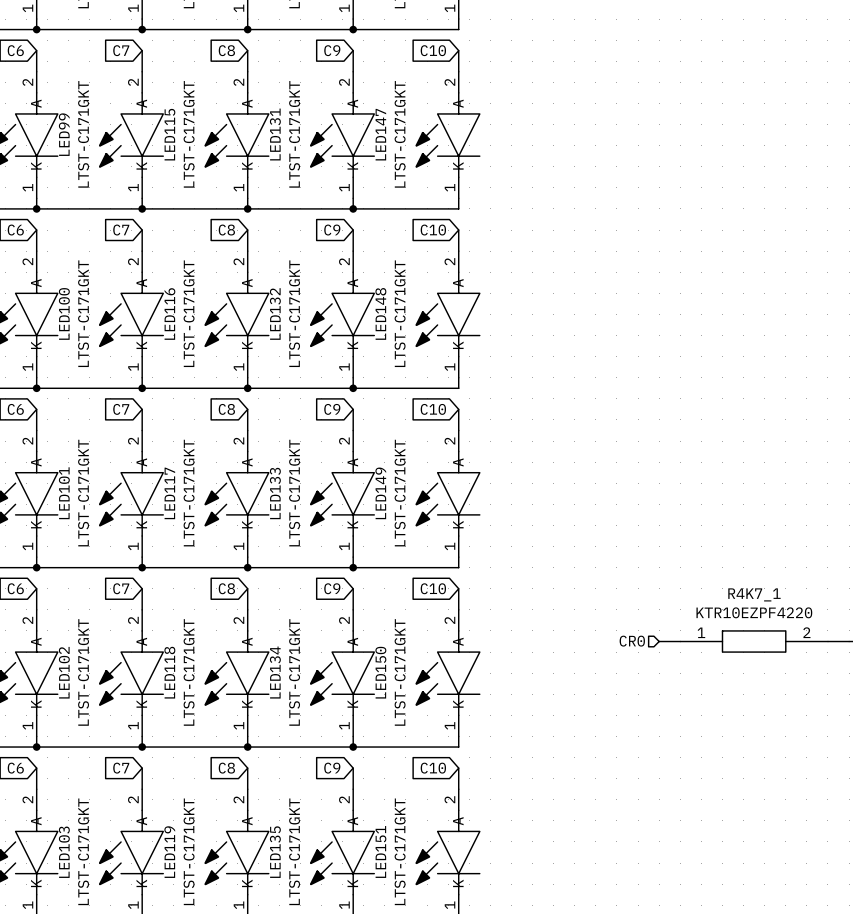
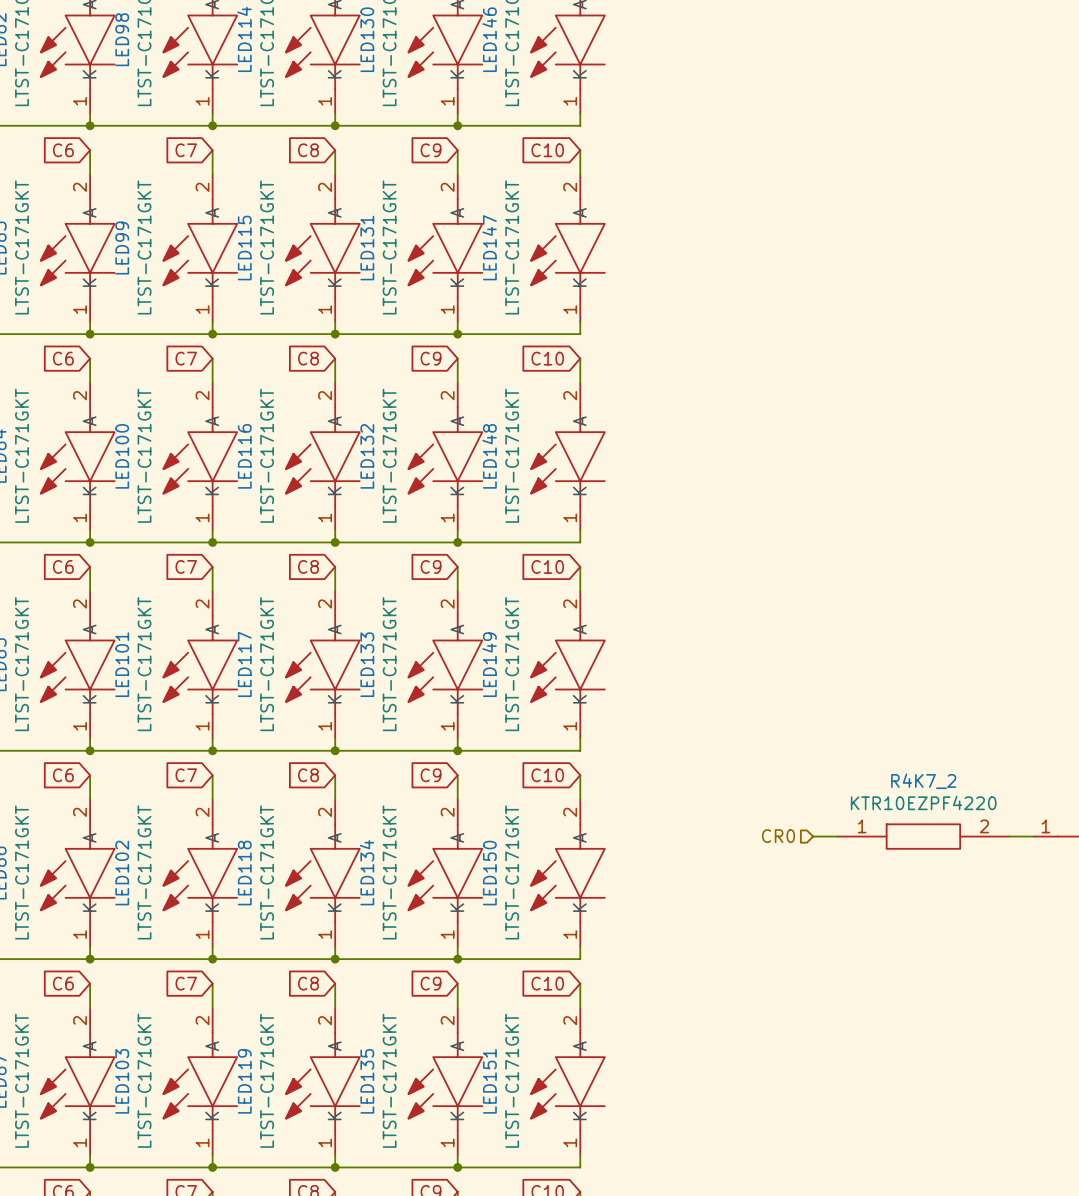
R4K7_1 name: R4K7_1 (754, 594) -> R4K7_2 (923, 781)

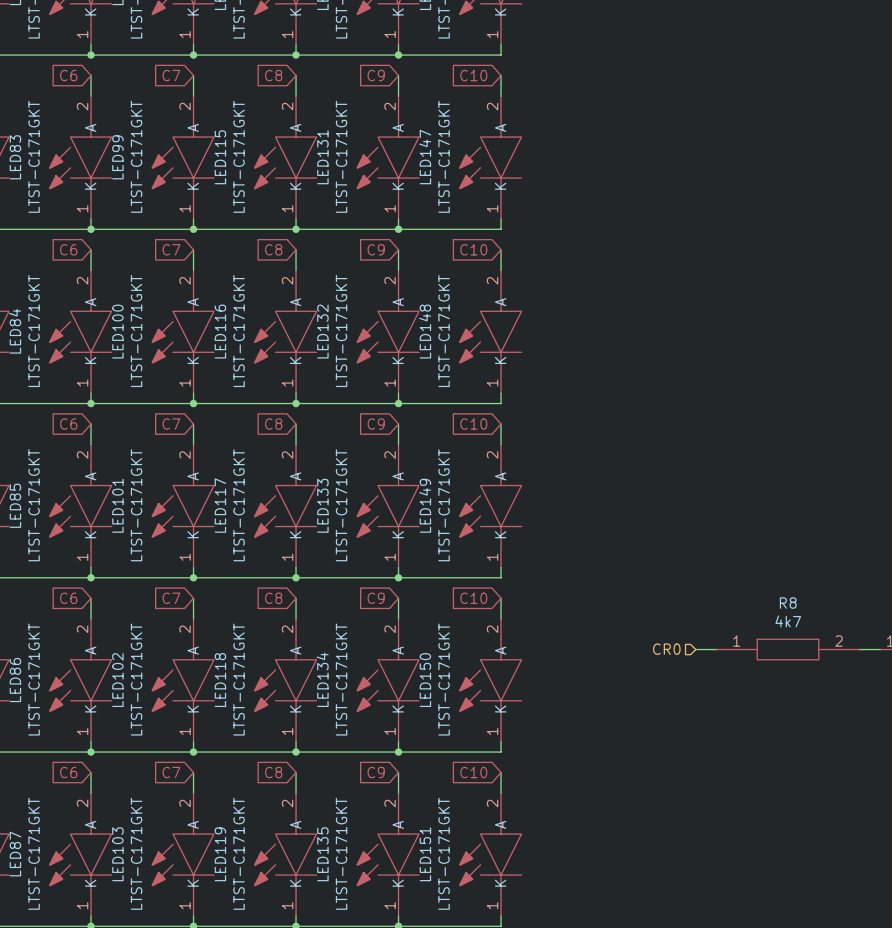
R4K7_2 name: R4K7_2 (923, 781) -> R8 (788, 603)
R4K7_2 value: KTR10EZPF4220 (923, 802) -> 4k7 (788, 621)

